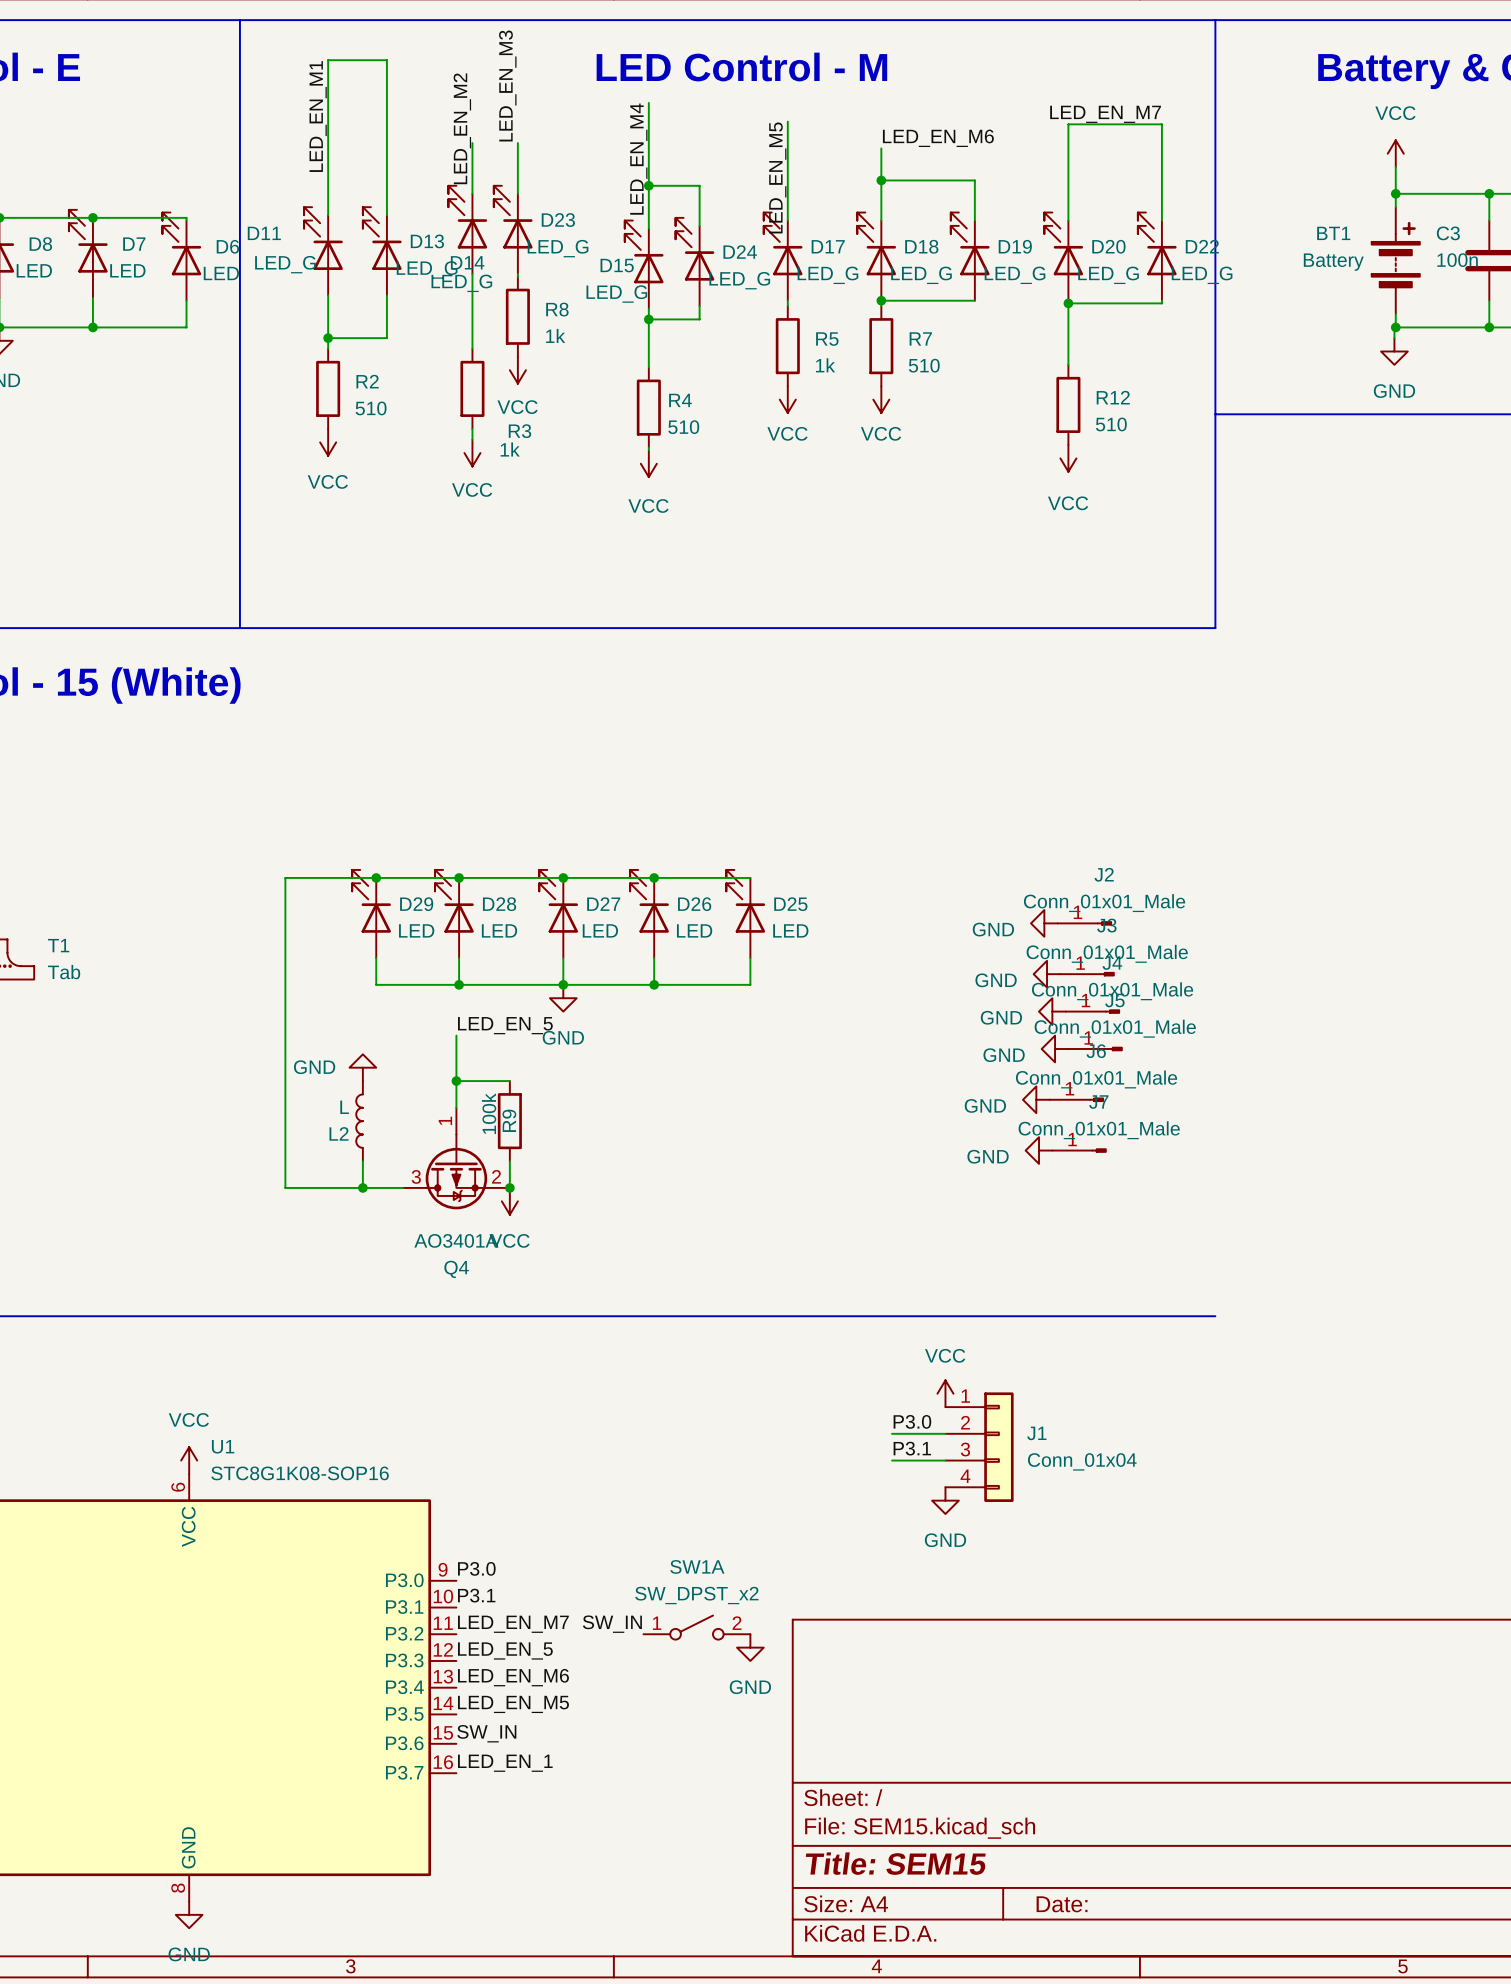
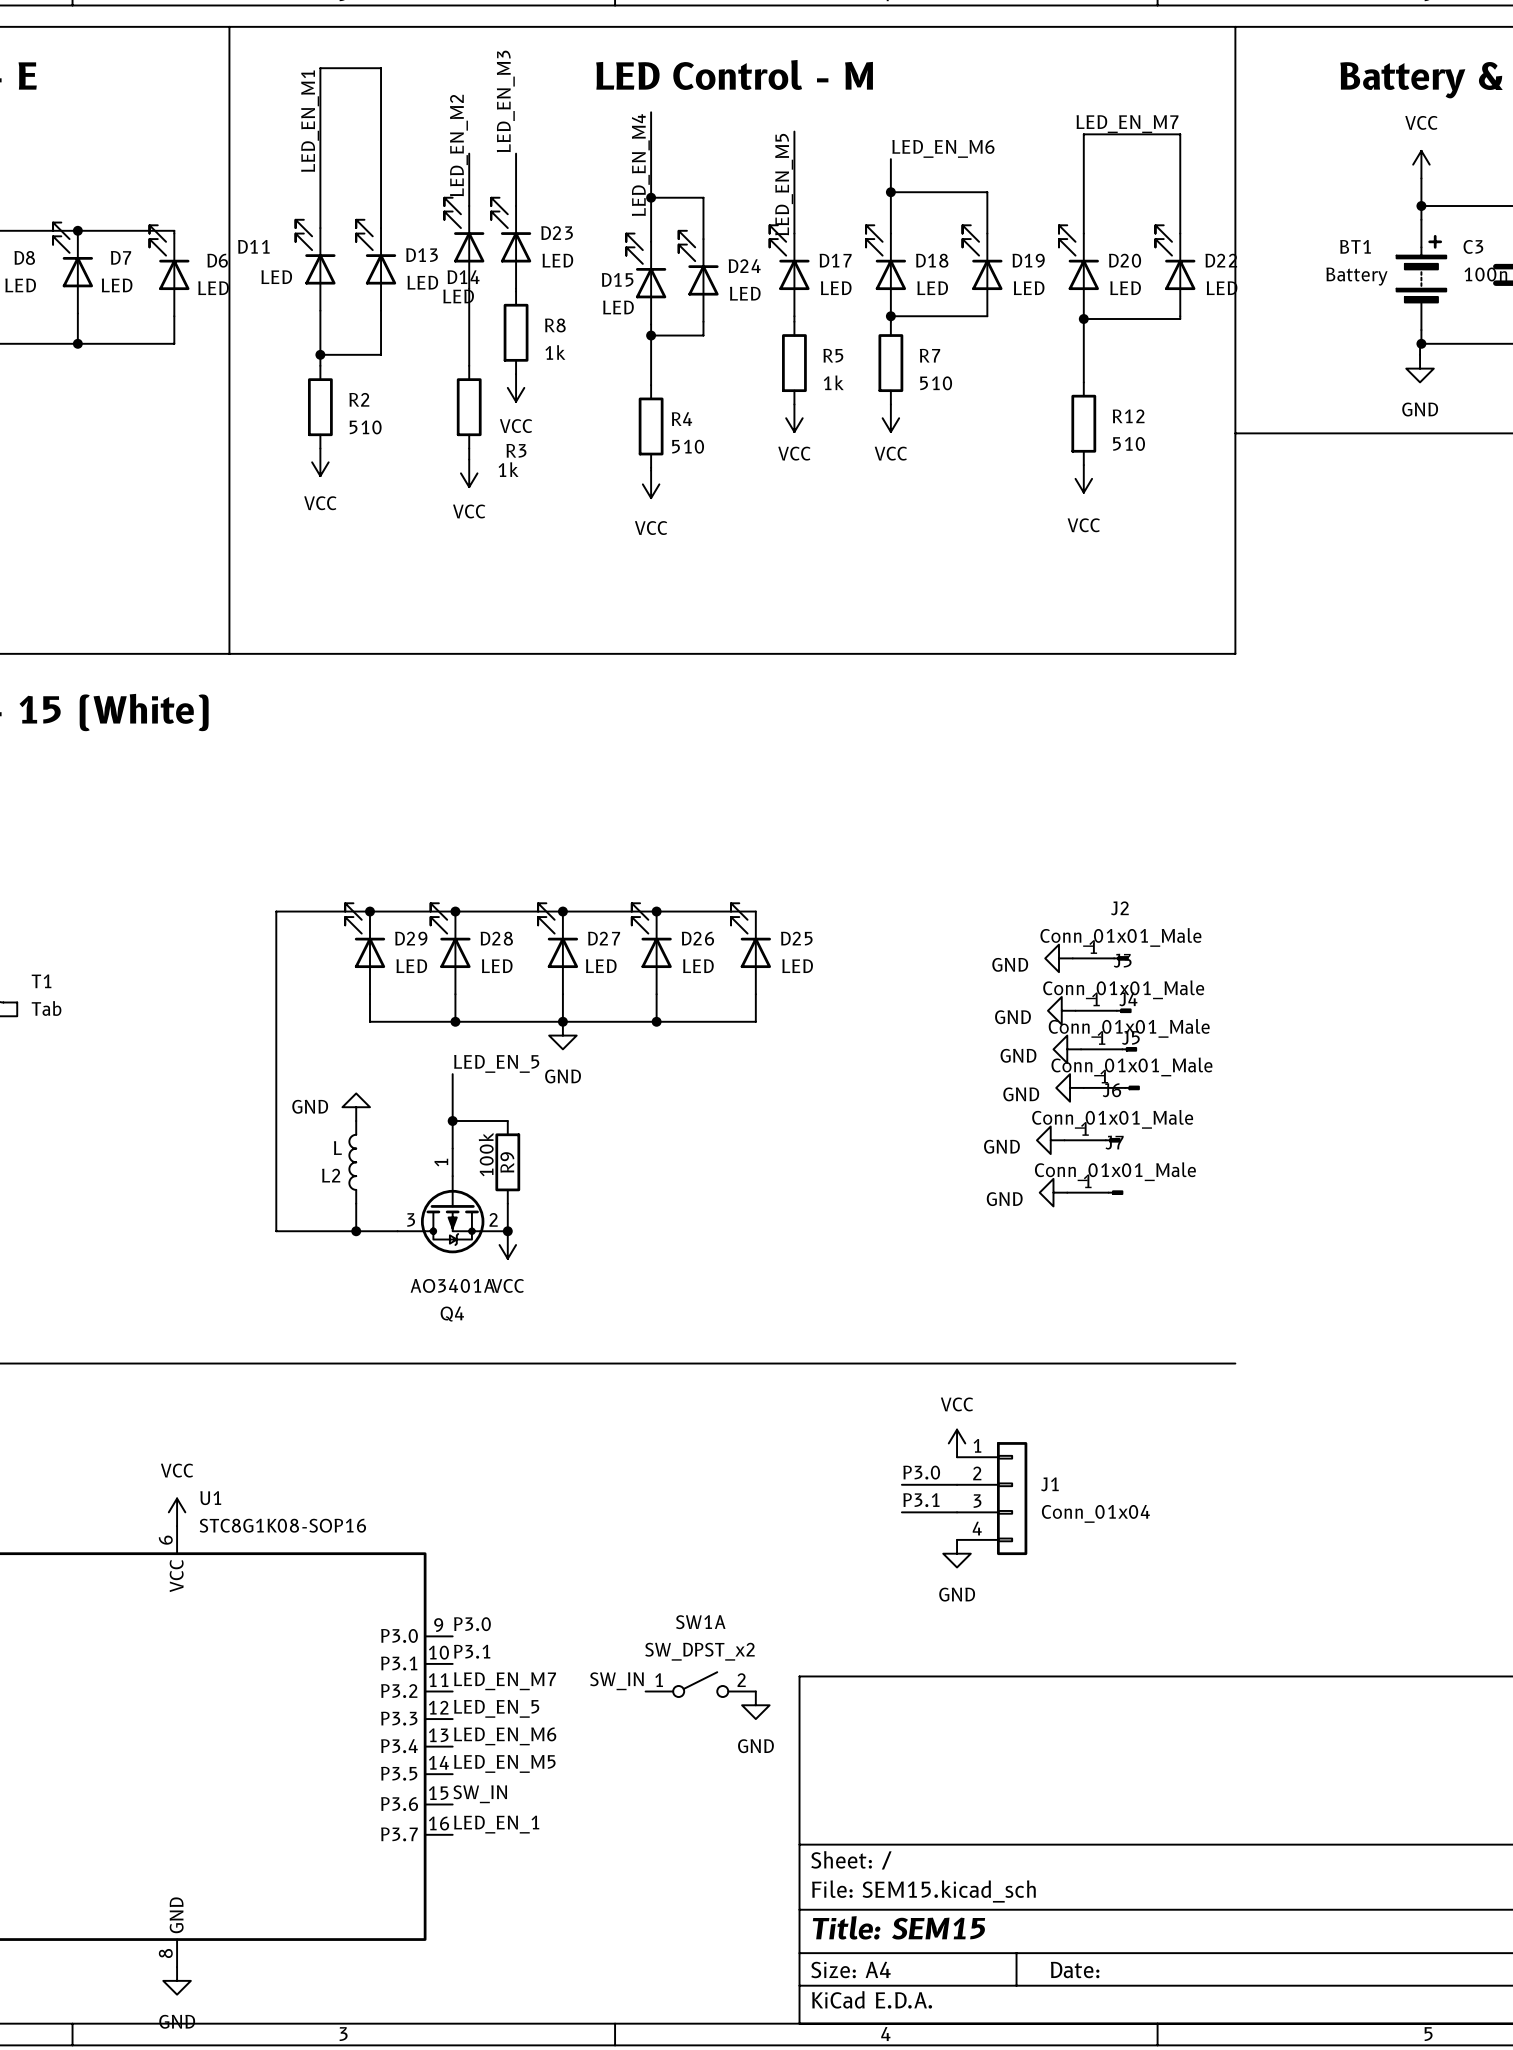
D23 value: LED_G (558, 248) -> LED (557, 260)
D11 value: LED_G (285, 264) -> LED (276, 277)
D13 value: LED_G (427, 269) -> LED (422, 282)
D17 value: LED_G (827, 275) -> LED (836, 288)
D18 value: LED_G (921, 275) -> LED (932, 288)
D19 value: LED_G (1015, 275) -> LED (1029, 288)
D20 value: LED_G (1108, 275) -> LED (1125, 288)
D22 value: LED_G (1202, 275) -> LED (1222, 288)
D24 value: LED_G (739, 280) -> LED (745, 293)
D14 value: LED_G (461, 283) -> LED (458, 296)
D15 value: LED_G (616, 294) -> LED (618, 307)

